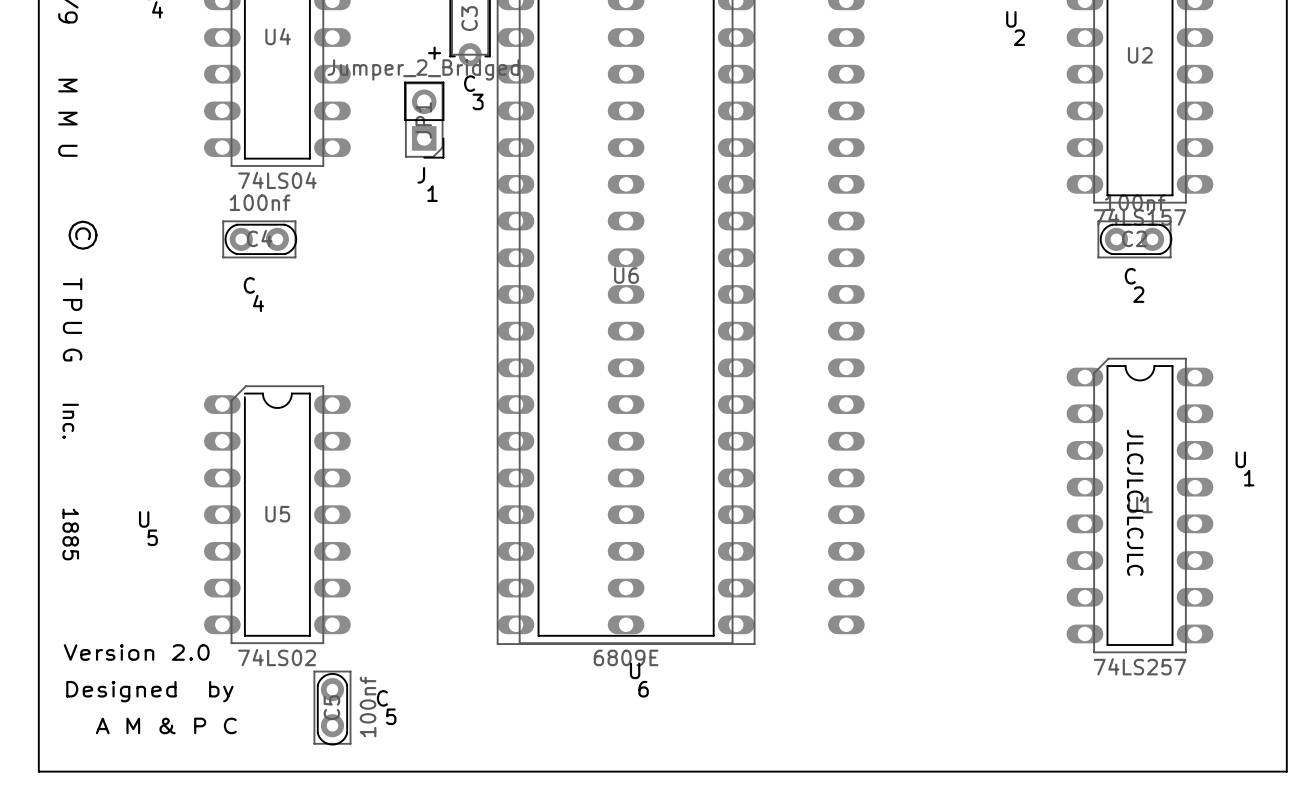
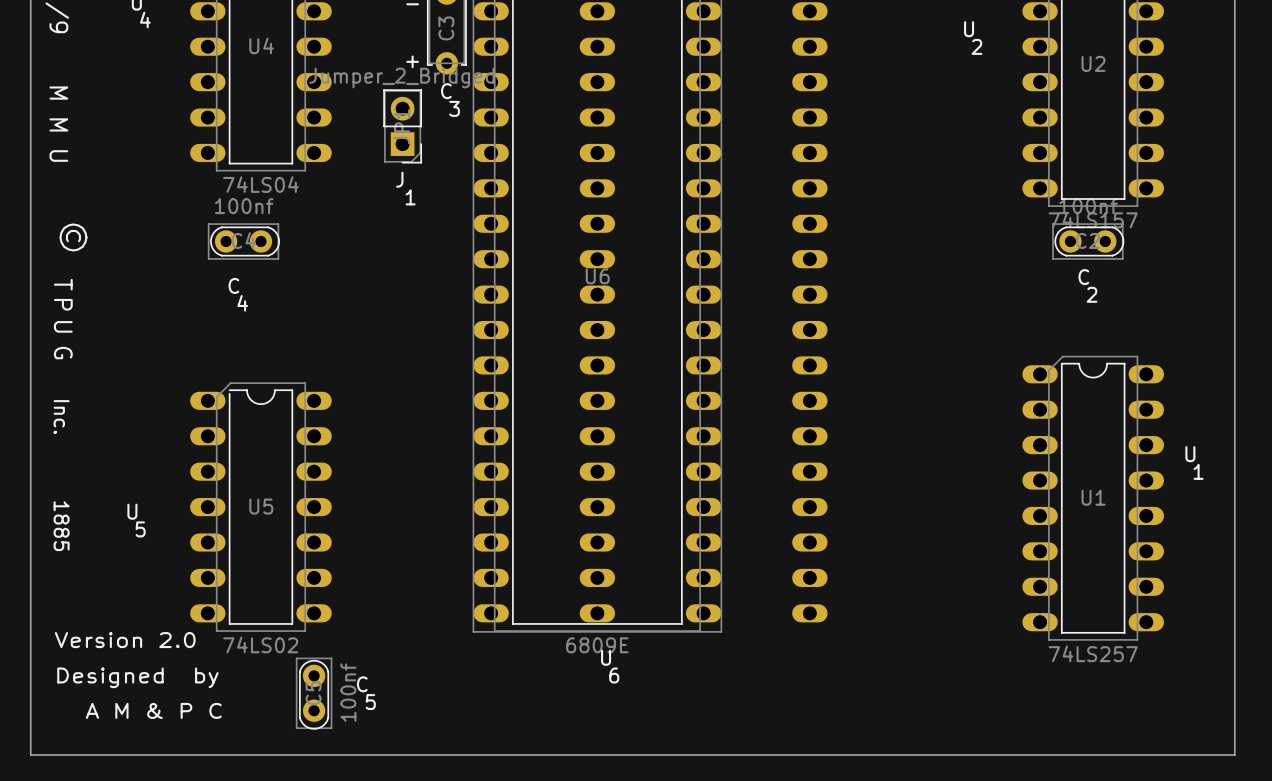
text: JLCJLCJLCJLC (1135, 502) -> none

